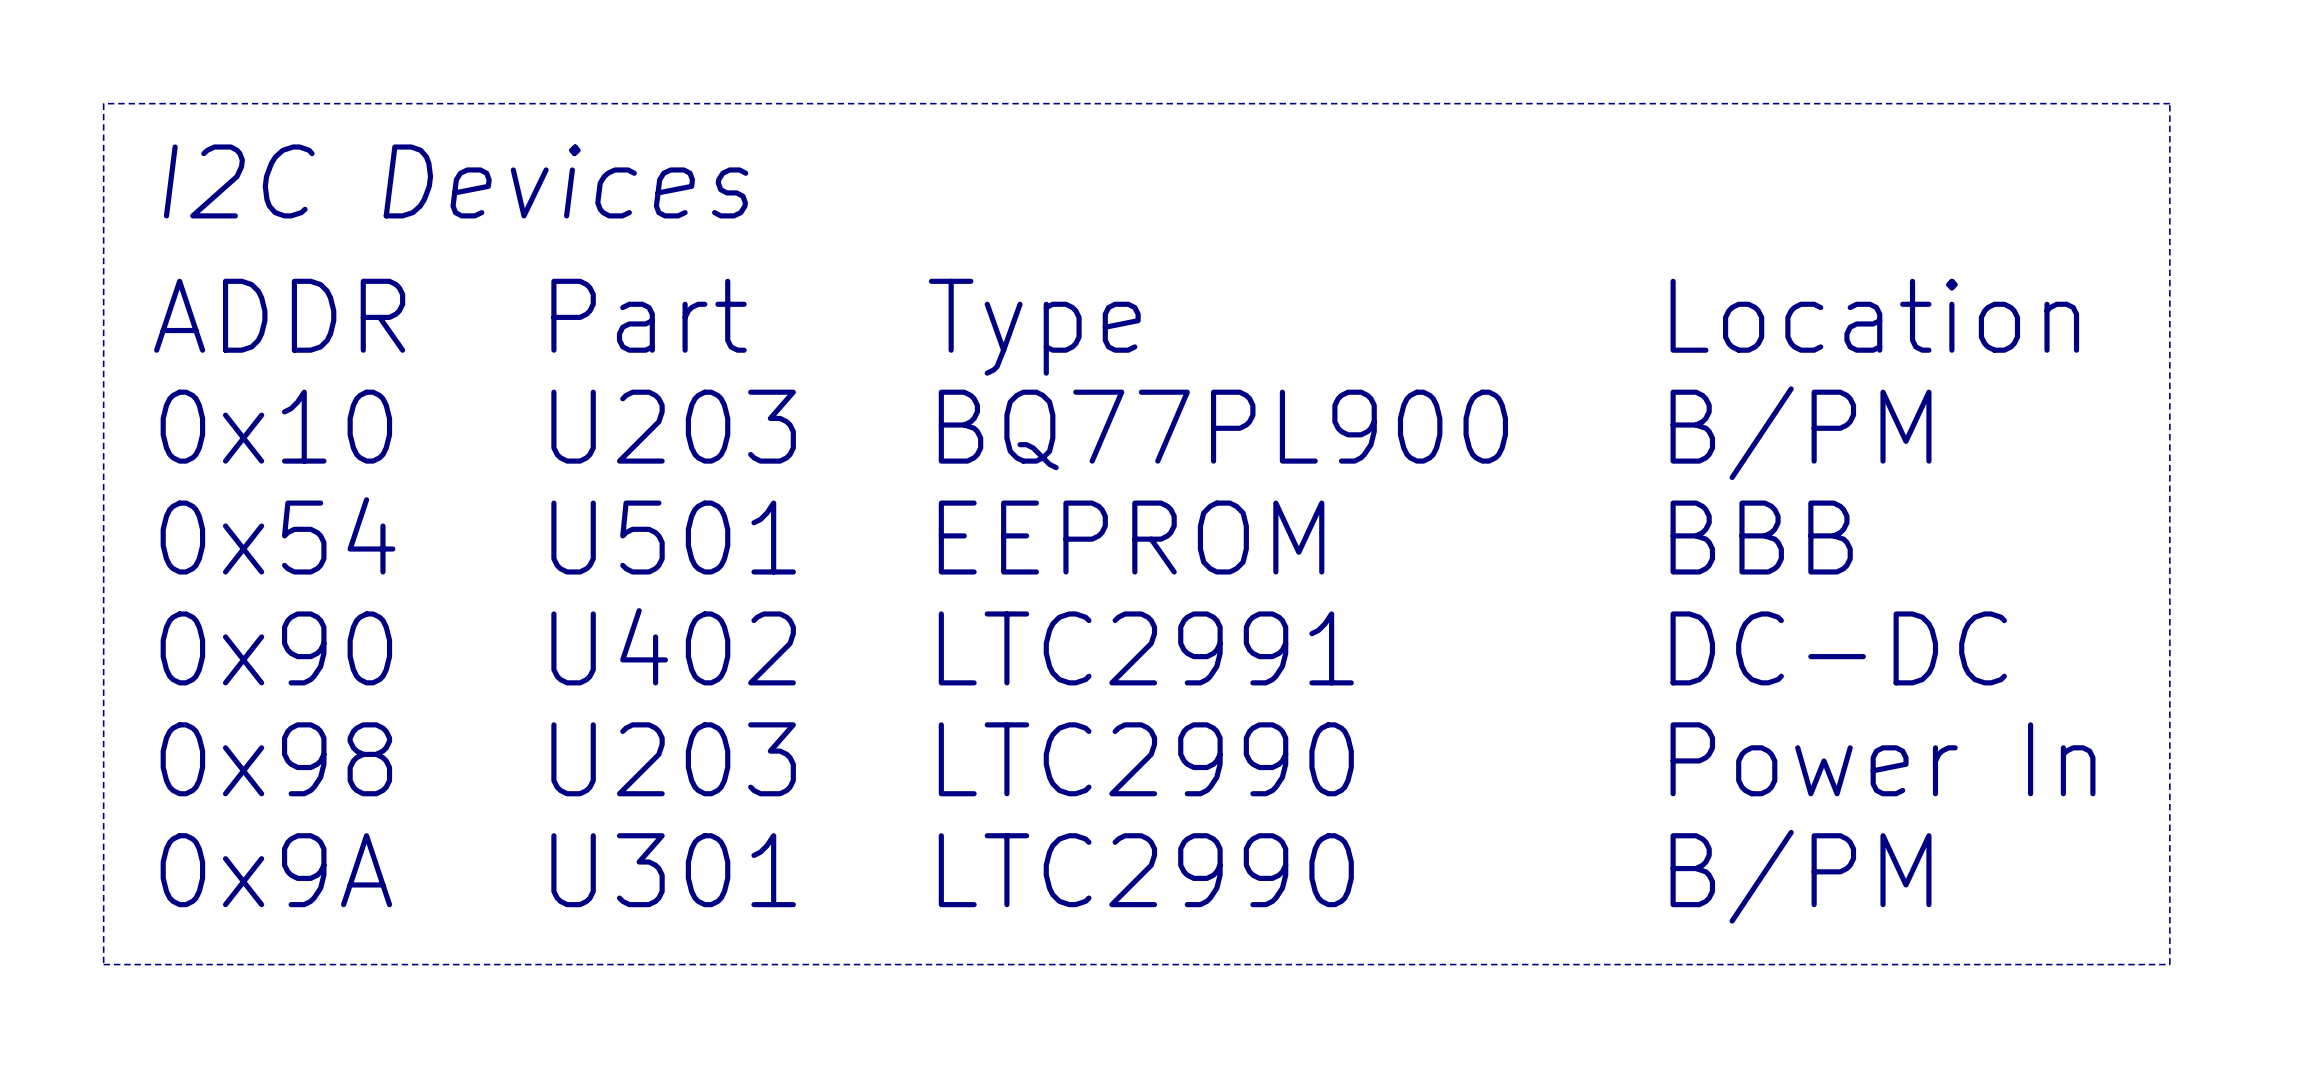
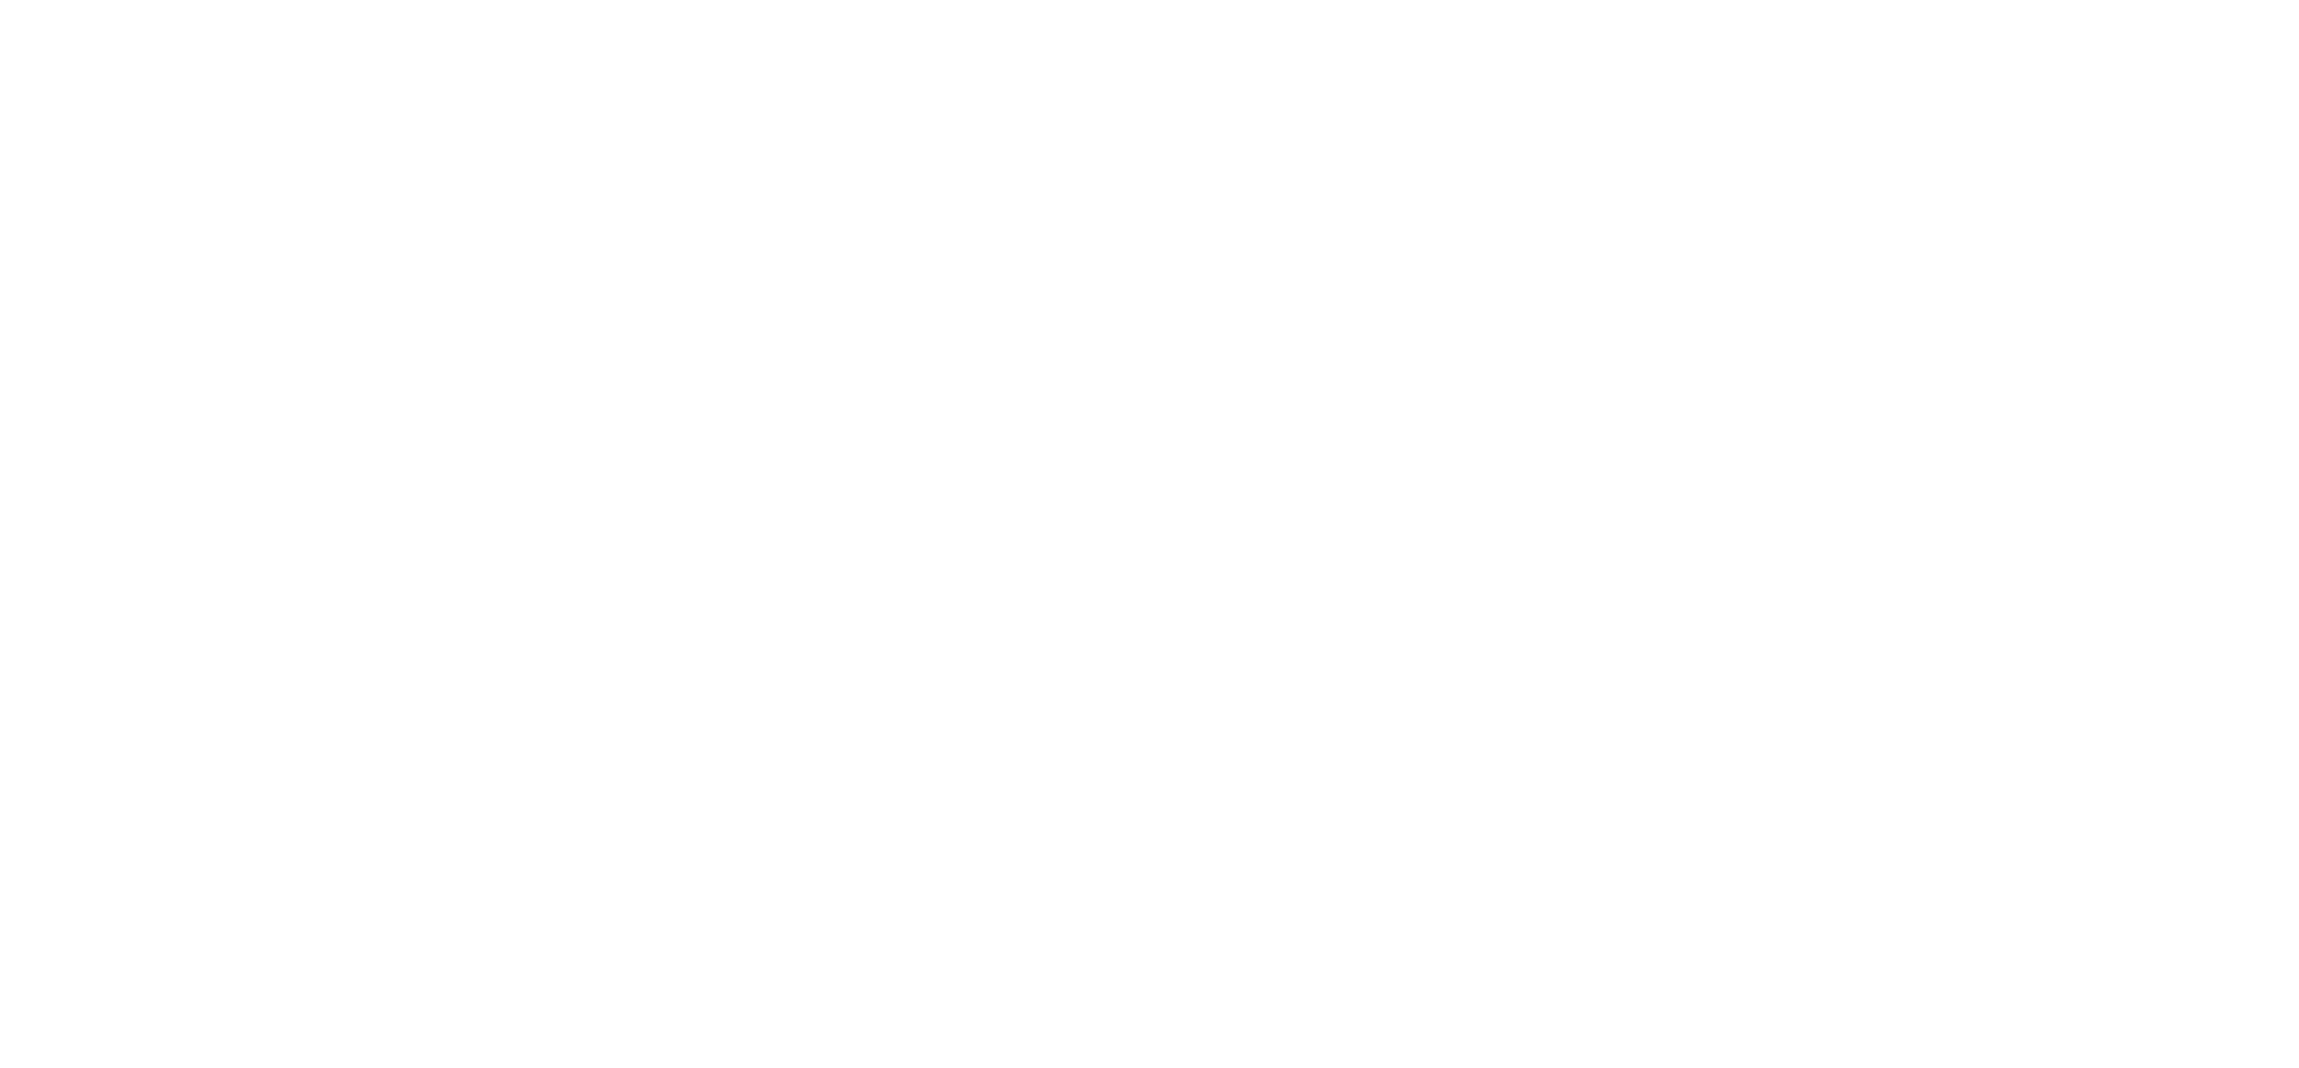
line: (103, 103) (103, 964) (2169, 964) (2169, 103) (103, 103) -> none
text: I2C Devices (456, 181) -> none
text: ADDR (279, 315) -> none
text: Part (649, 315) -> none
text: Location (1874, 315) -> none
text: Type (1034, 327) -> none
text: 0x10 (276, 426) -> none
text: U203 (673, 426) -> none
text: BQ77PL900 (1223, 429) -> none
text: B/PM (1801, 433) -> none
text: 0x54 (278, 535) -> none
text: U501 (673, 537) -> none
text: EEPROM (1131, 537) -> none
text: BBB (1761, 537) -> none
text: U402 (673, 646) -> none
text: 0x90 (276, 648) -> none
text: LTC2991 (1146, 648) -> none
text: DC-DC (1838, 648) -> none
text: 0x98 (276, 759) -> none
text: U203 (673, 759) -> none
text: LTC2990 (1146, 759) -> none
text: Power In (1883, 759) -> none
text: 0x9A (276, 870) -> none
text: U301 (673, 870) -> none
text: LTC2990 (1146, 870) -> none
text: B/PM (1801, 876) -> none

